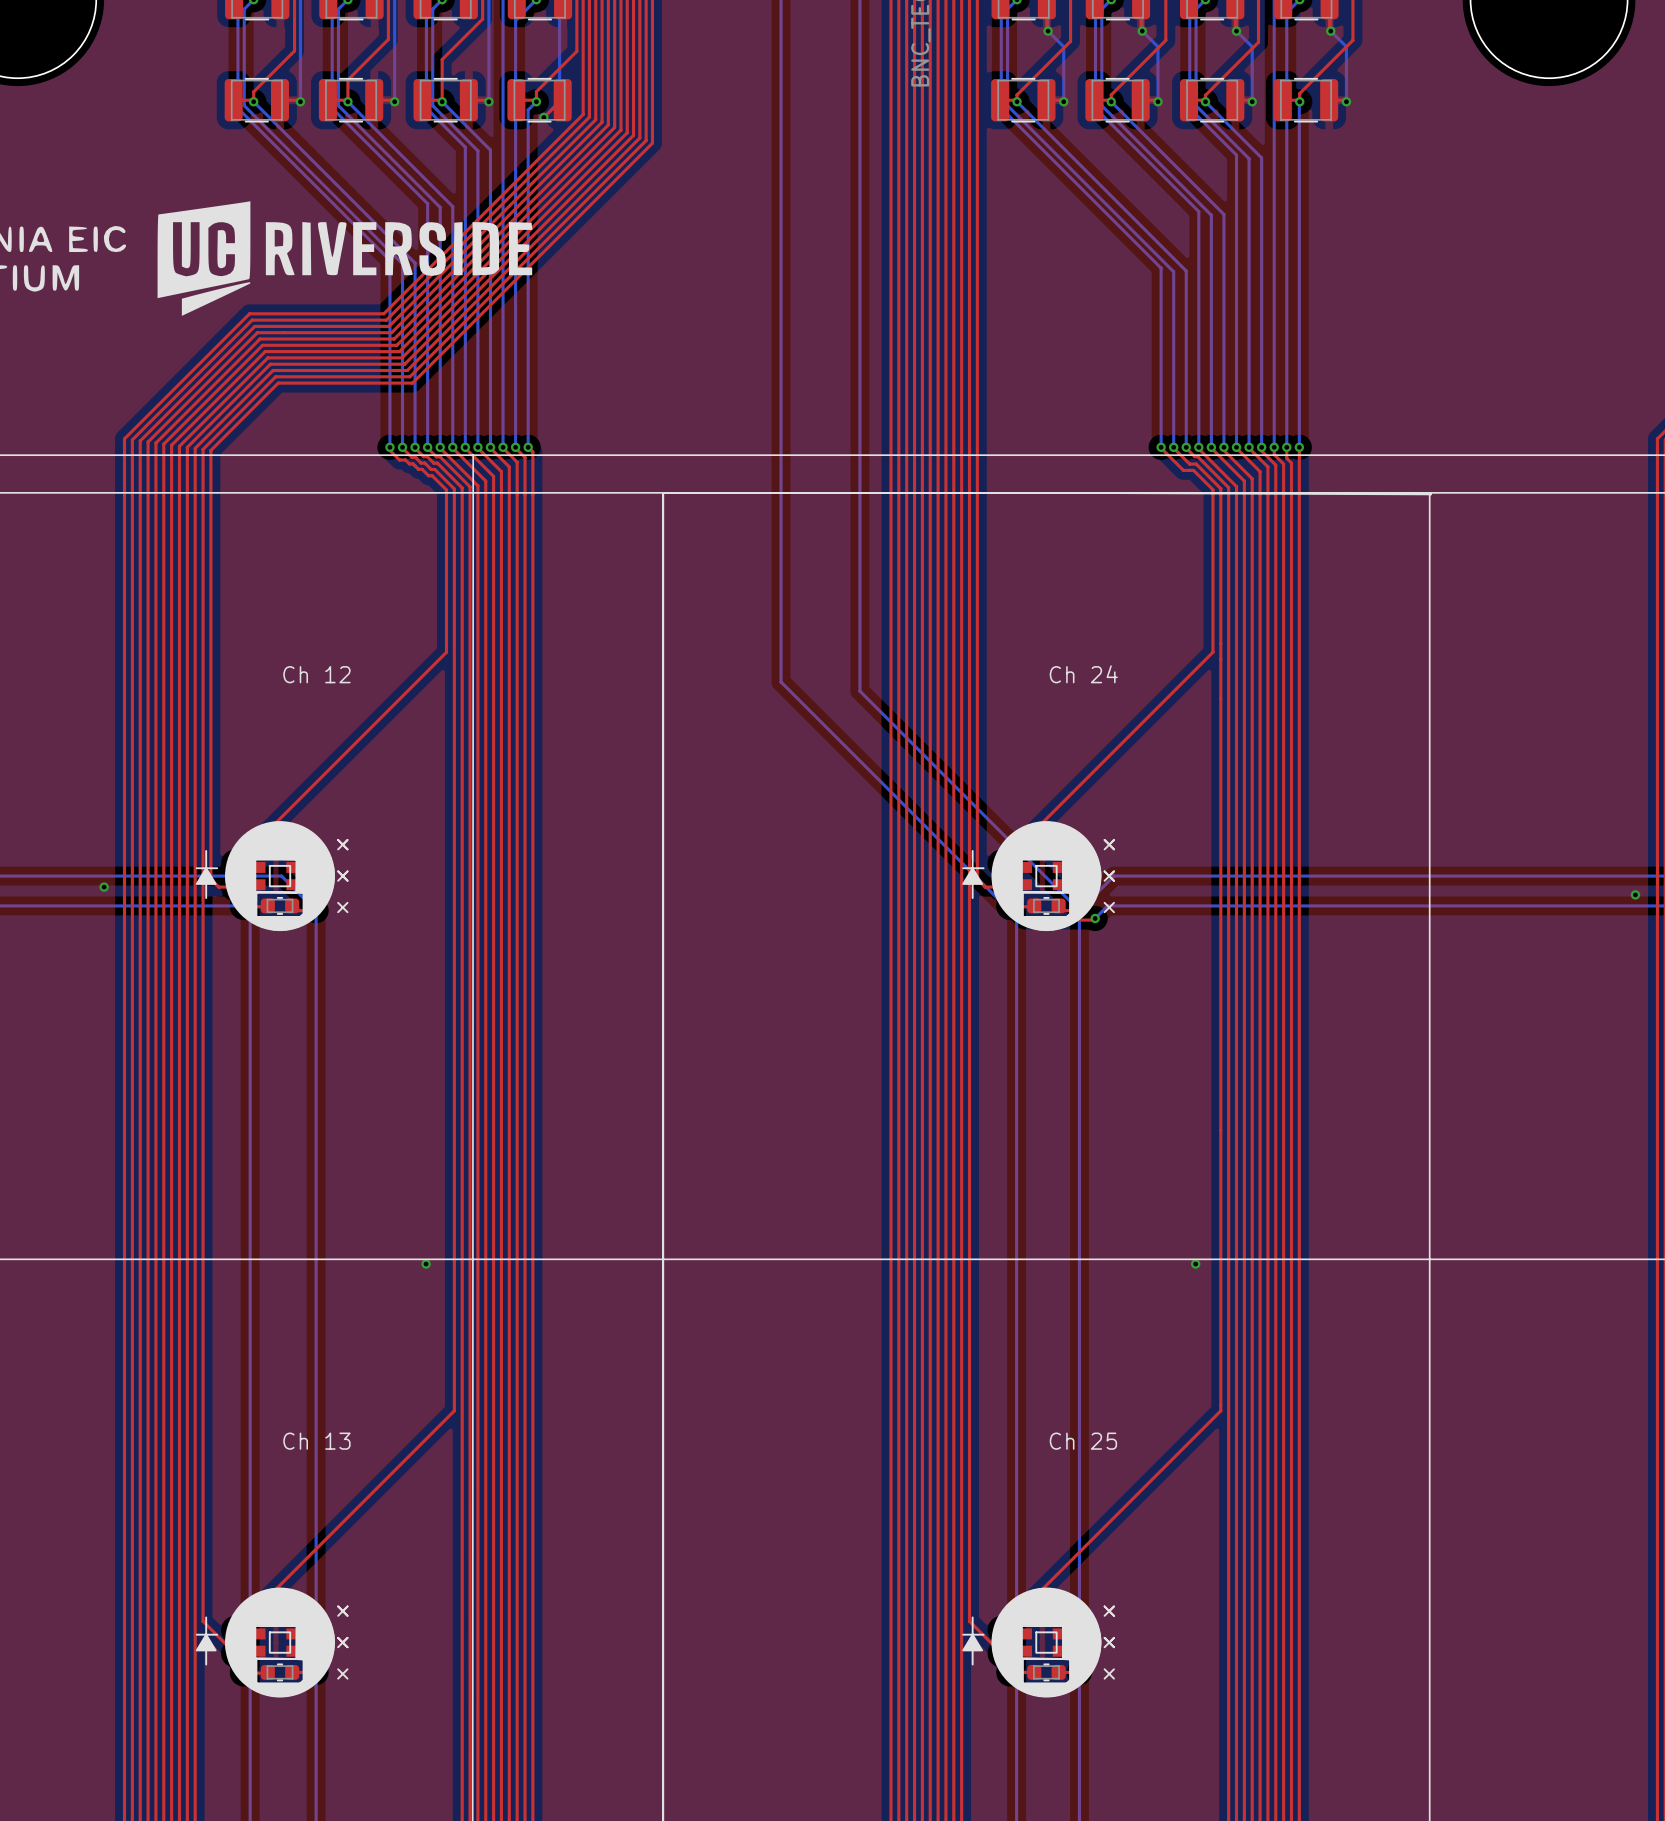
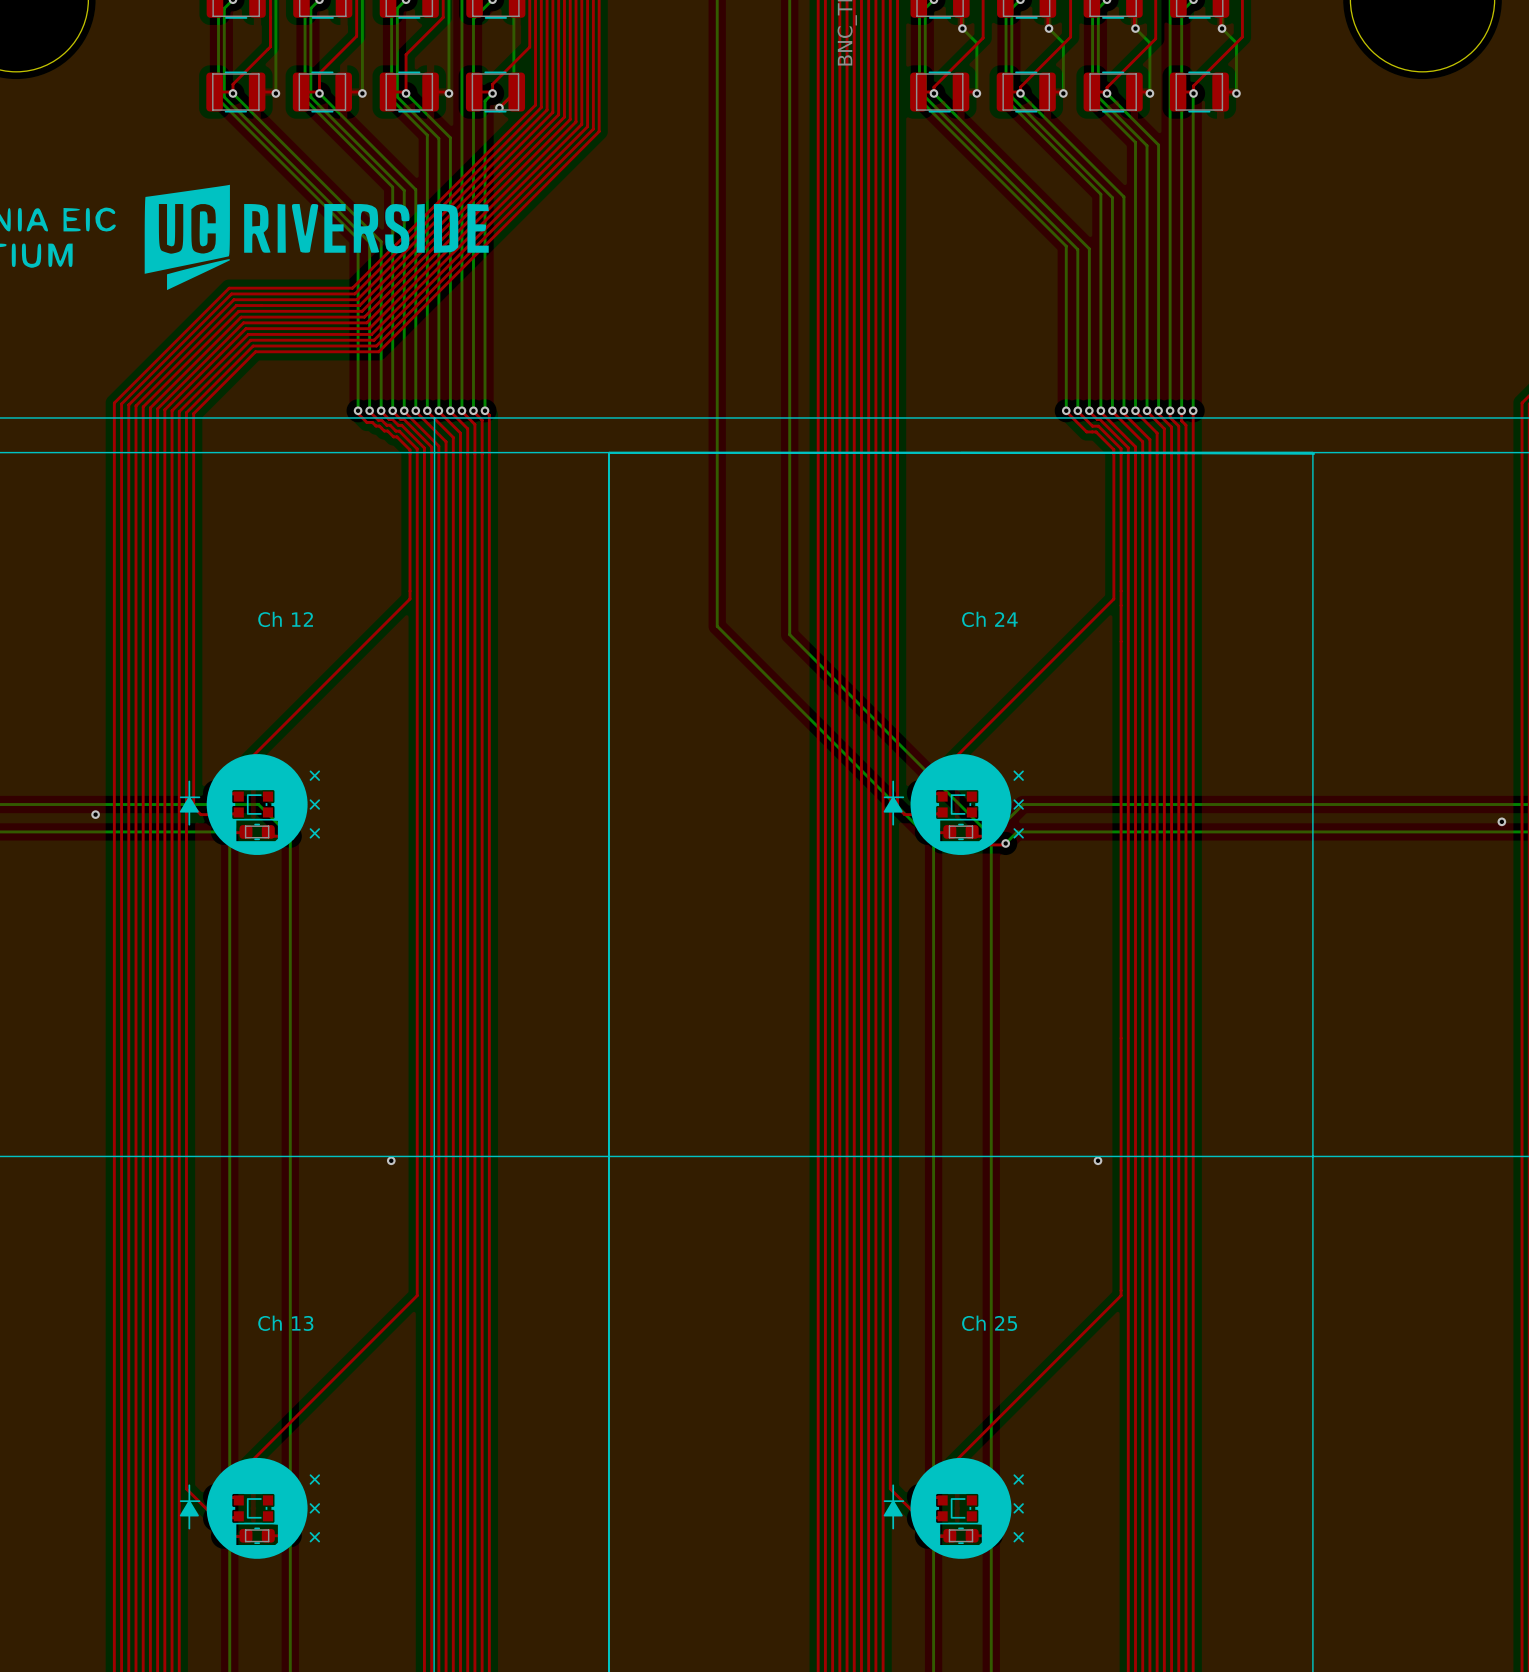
part footprint: [195, 821, 349, 932] -> [179, 754, 320, 855]
part footprint: [962, 821, 1115, 932] -> [883, 754, 1024, 855]
part footprint: [195, 1587, 349, 1698] -> [179, 1457, 320, 1559]
part footprint: [962, 1587, 1115, 1698] -> [883, 1457, 1024, 1559]

